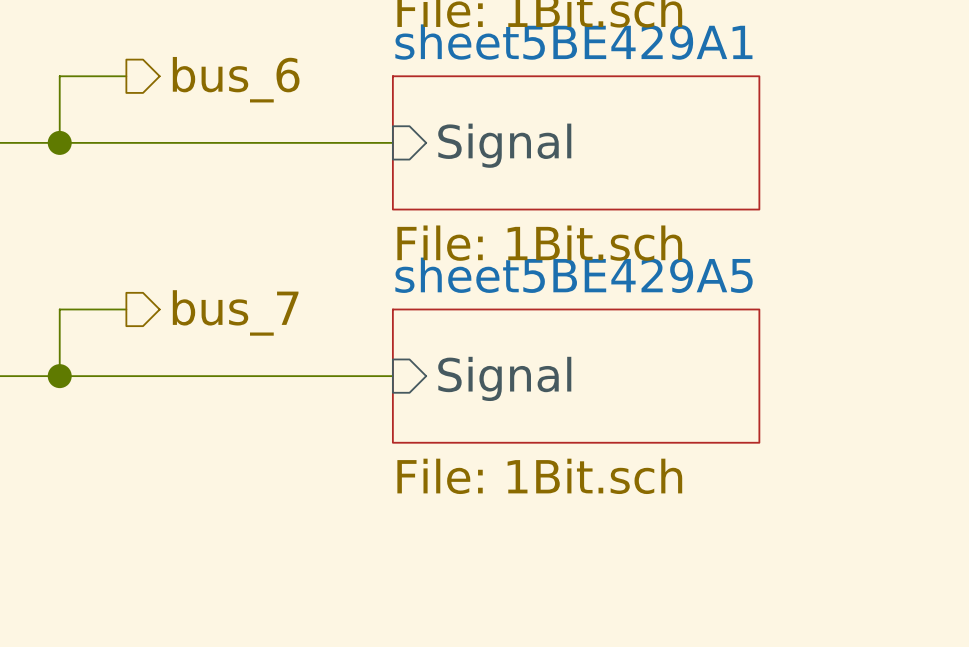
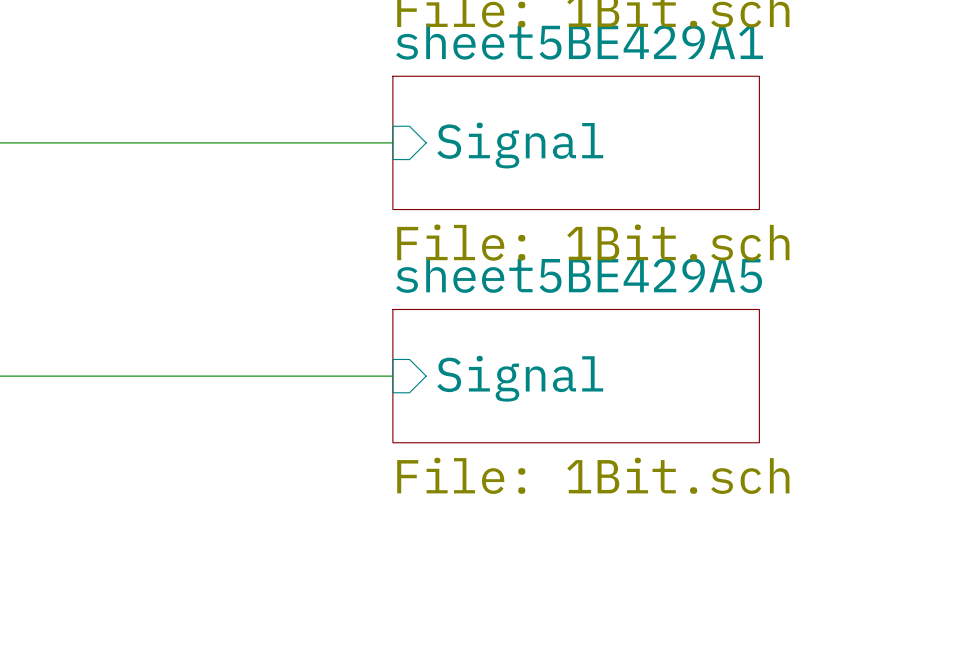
wire: (126, 76) (59, 76) (59, 142) -> none
hierarchical label: bus_6 (236, 79) -> none
junction: (59, 142) -> none
wire: (126, 309) (59, 309) (59, 376) -> none
hierarchical label: bus_7 (235, 312) -> none
junction: (59, 376) -> none

